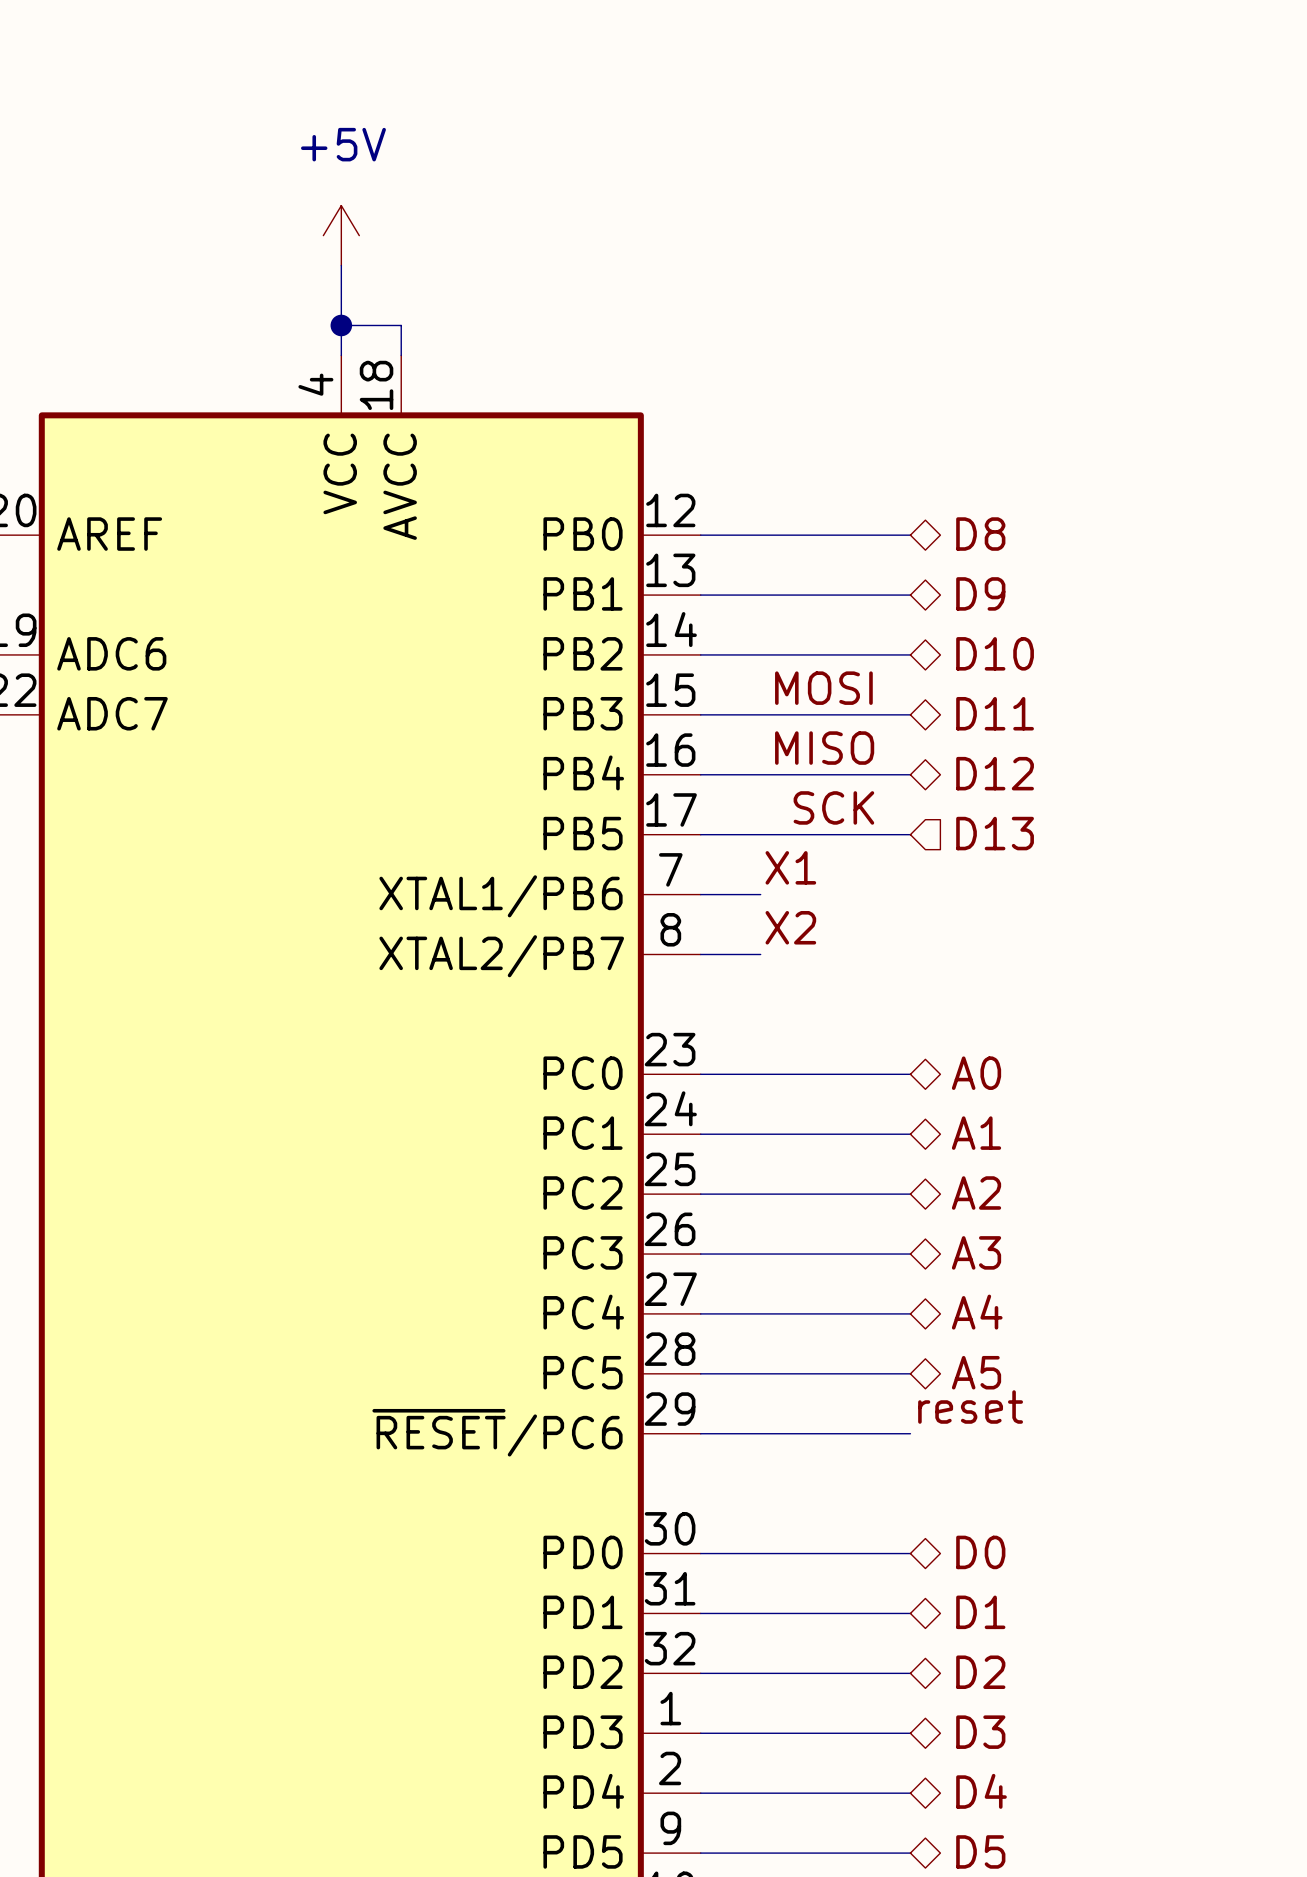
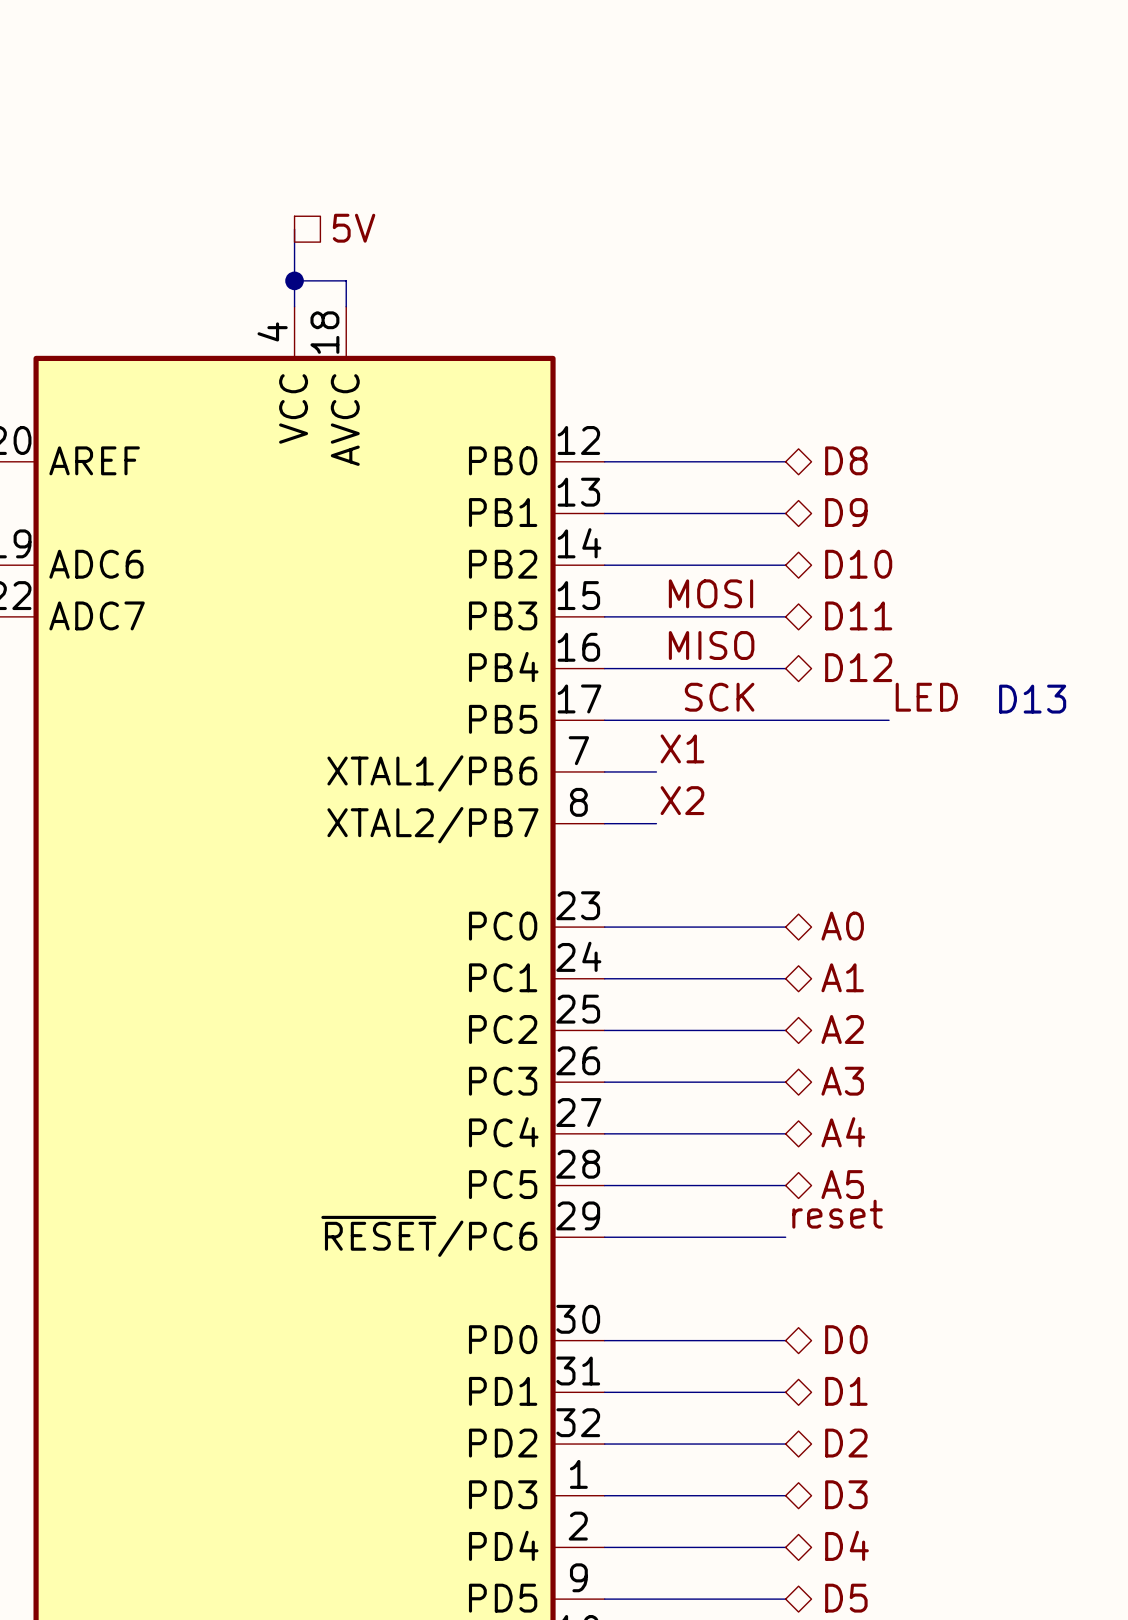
power symbol: +5V (341, 235) -> none
hierarchical label: none -> 5V (354, 228)
label: none -> LED (926, 697)
text: none -> D13 (1032, 699)
hierarchical label: D13 (995, 833) -> none
wire: none -> (785, 720) (889, 720)

